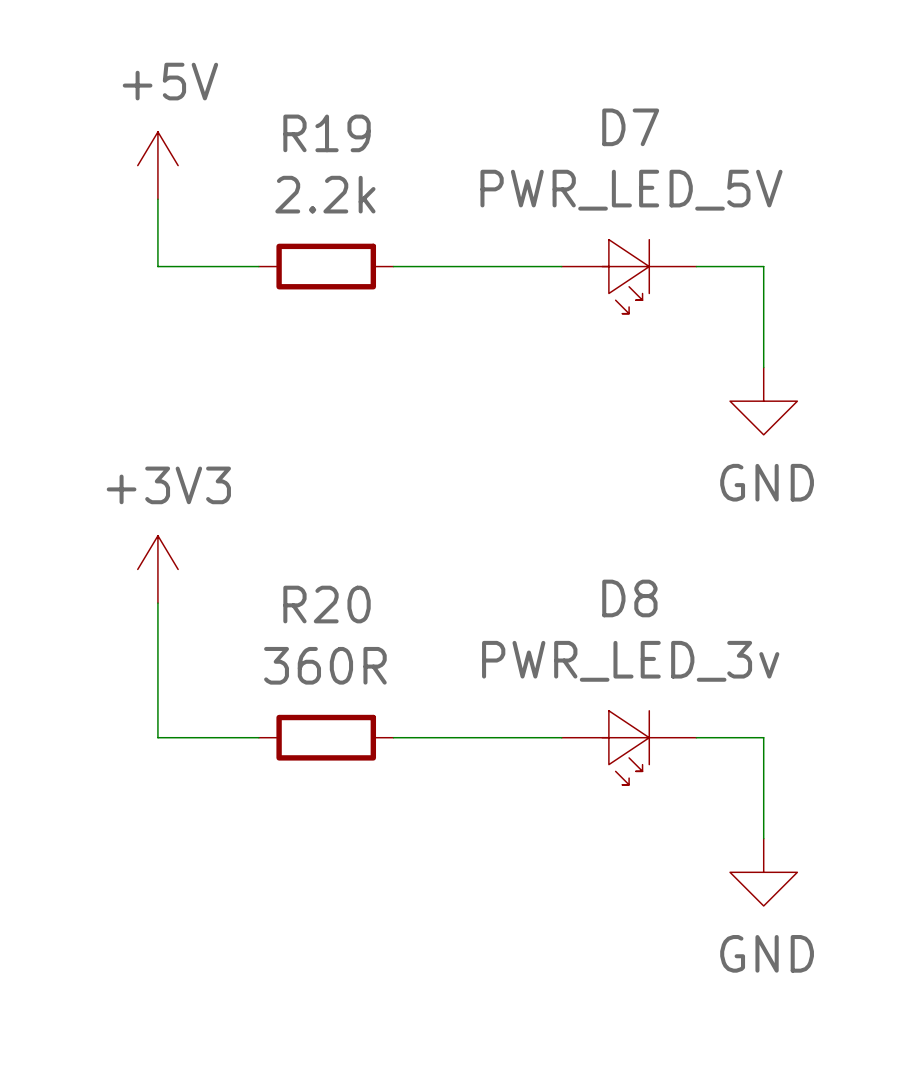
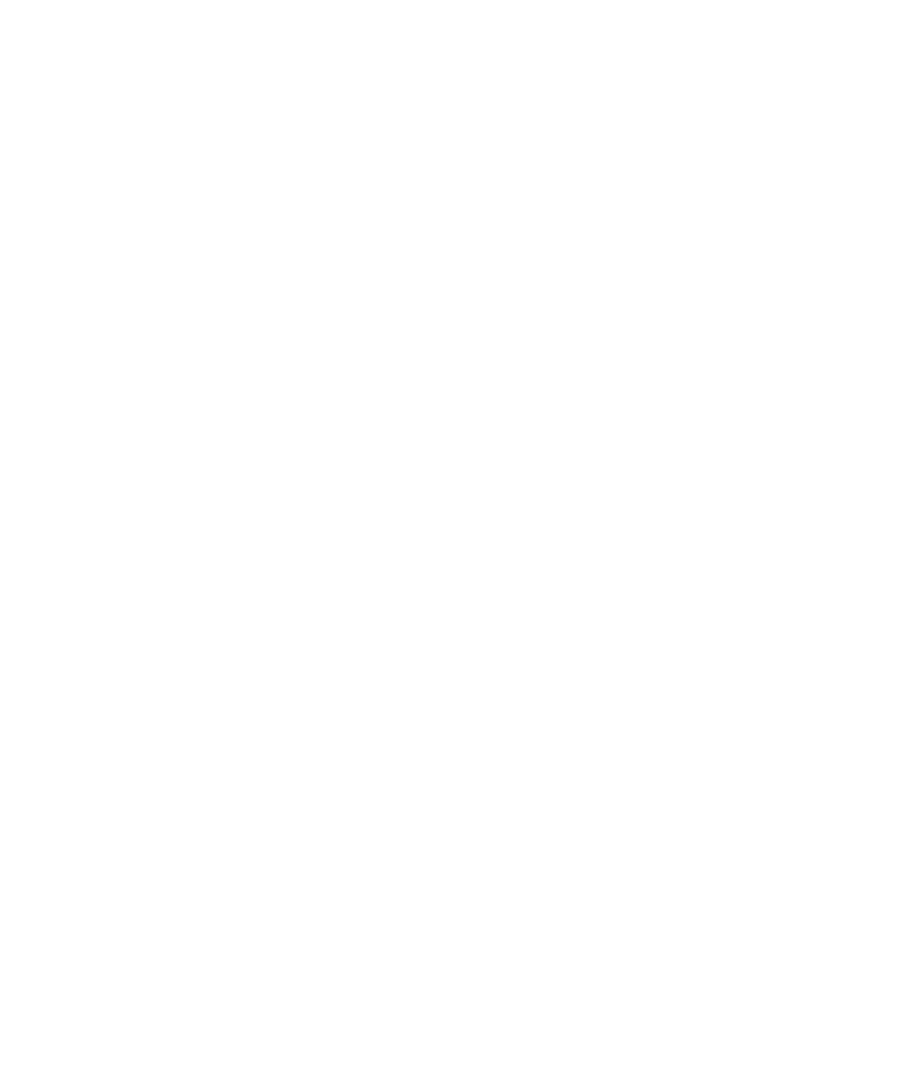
power symbol: +5V (157, 165) -> none
wire: (157, 199) (157, 266) (258, 266) -> none
R19: 2.2k (326, 266) -> none
wire: (393, 266) (561, 266) -> none
wire: (696, 266) (763, 266) (763, 367) -> none
D7: PWR_LED_5V (629, 276) -> none
power symbol: GND (763, 401) -> none
power symbol: +3V3 (157, 569) -> none
wire: (157, 603) (157, 737) (258, 737) -> none
R20: 360R (326, 737) -> none
wire: (393, 737) (561, 737) -> none
wire: (696, 737) (763, 737) (763, 838) -> none
D8: PWR_LED_3v (629, 747) -> none
power symbol: GND (763, 872) -> none

